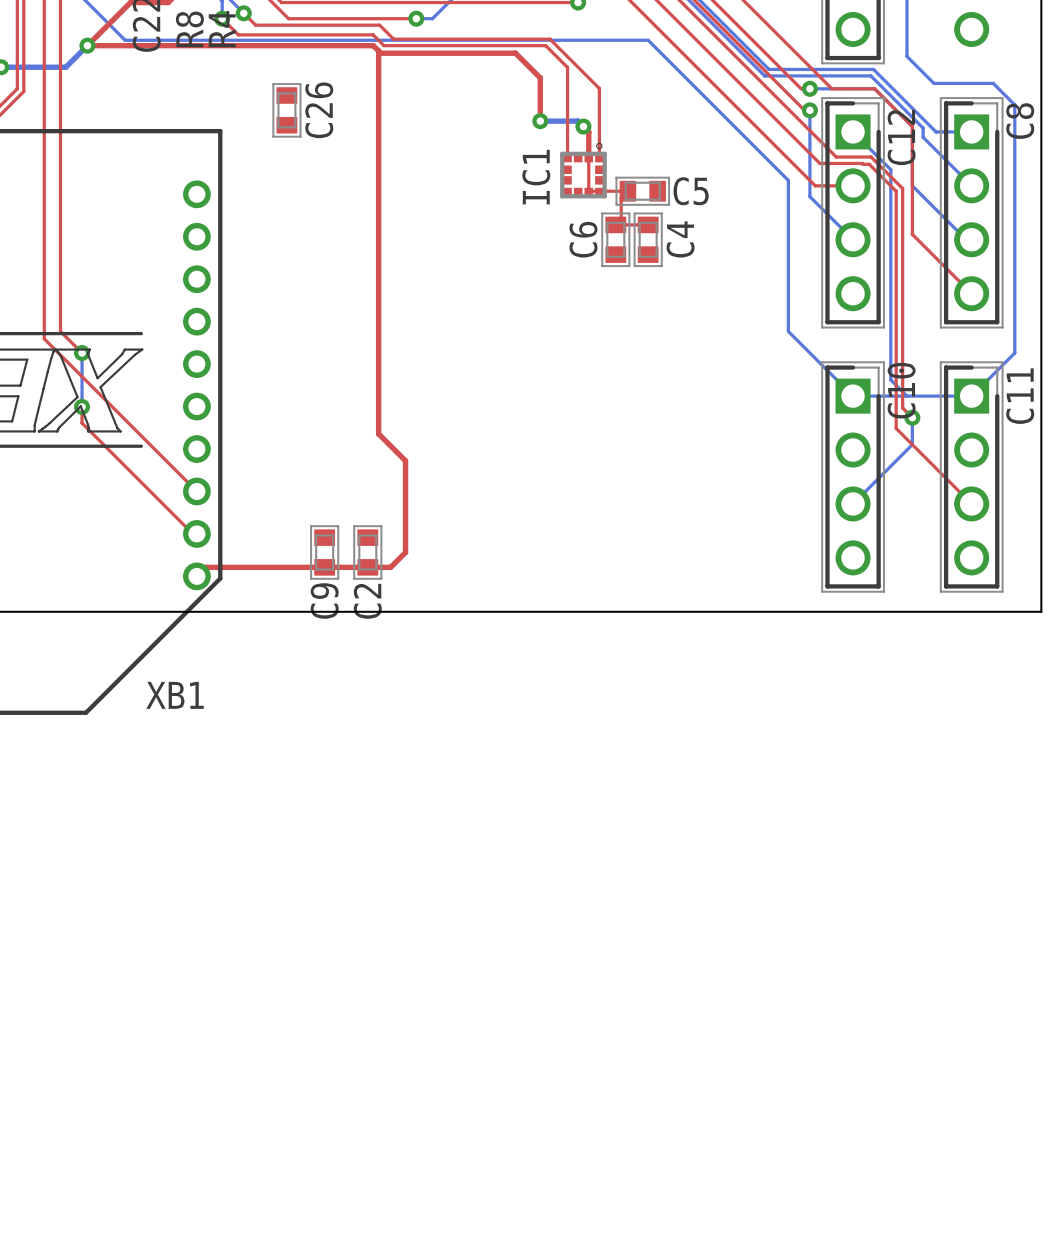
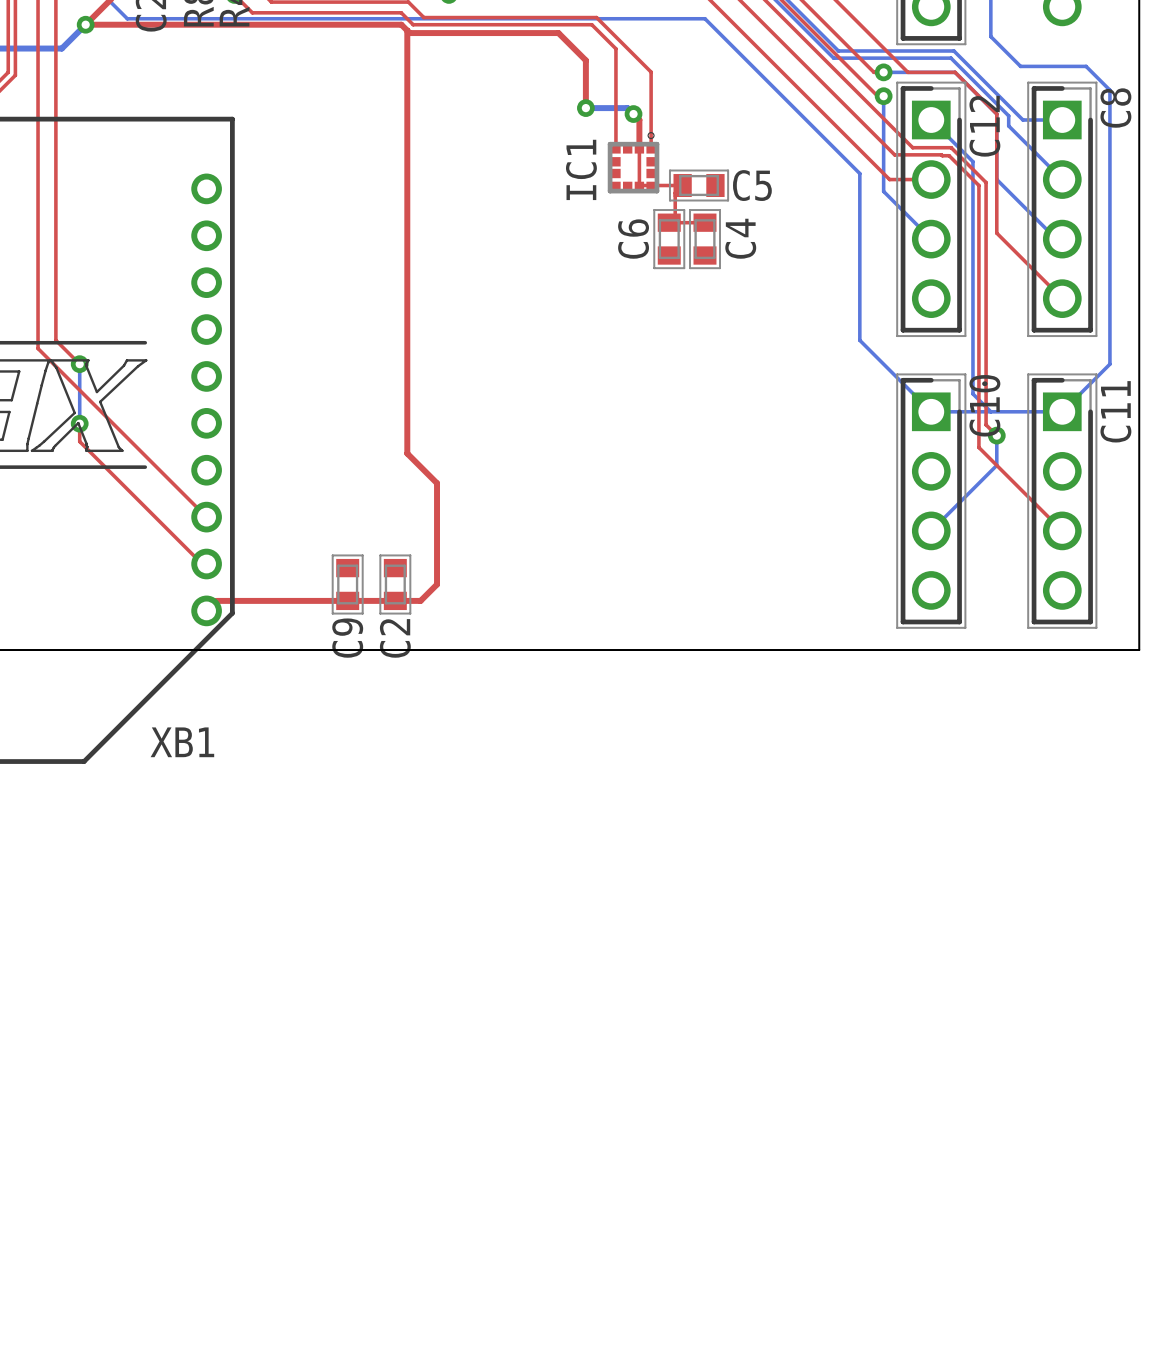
C26: (286, 110) -> none

